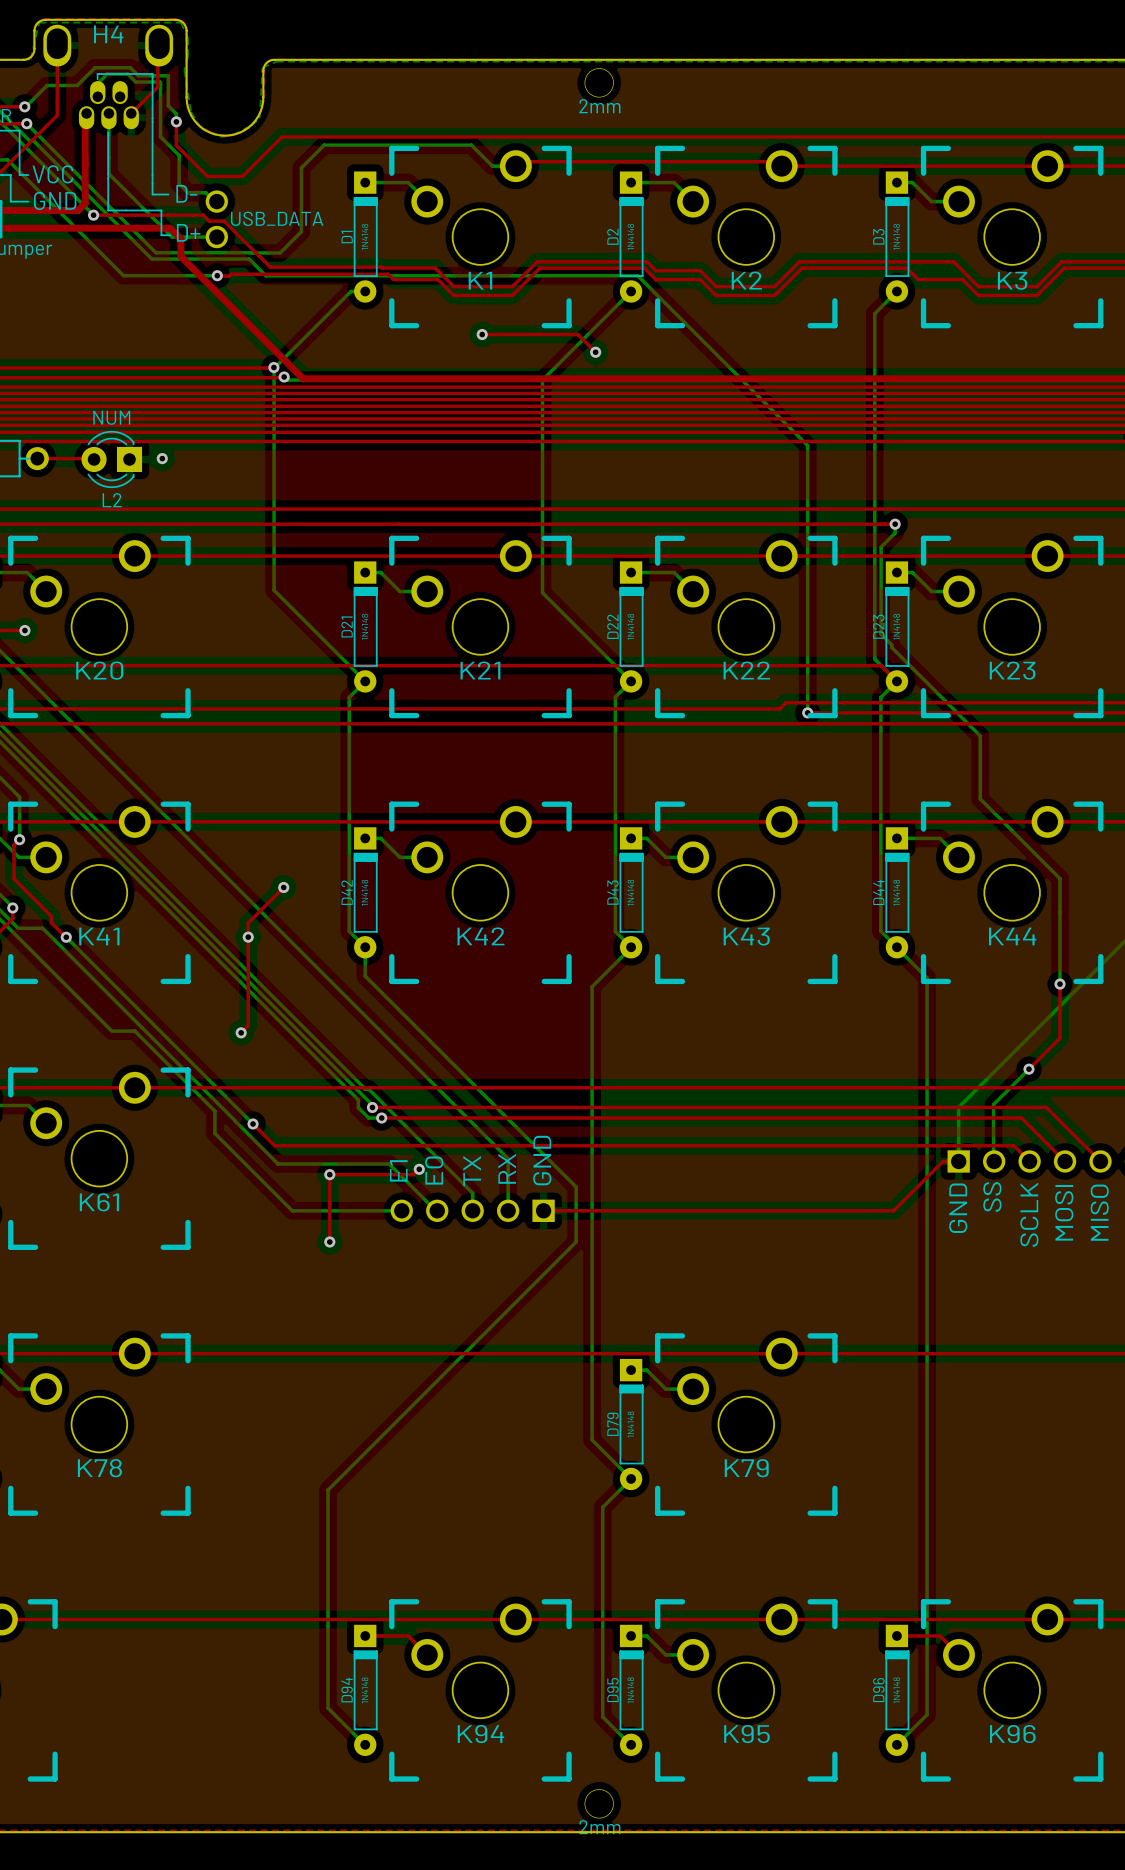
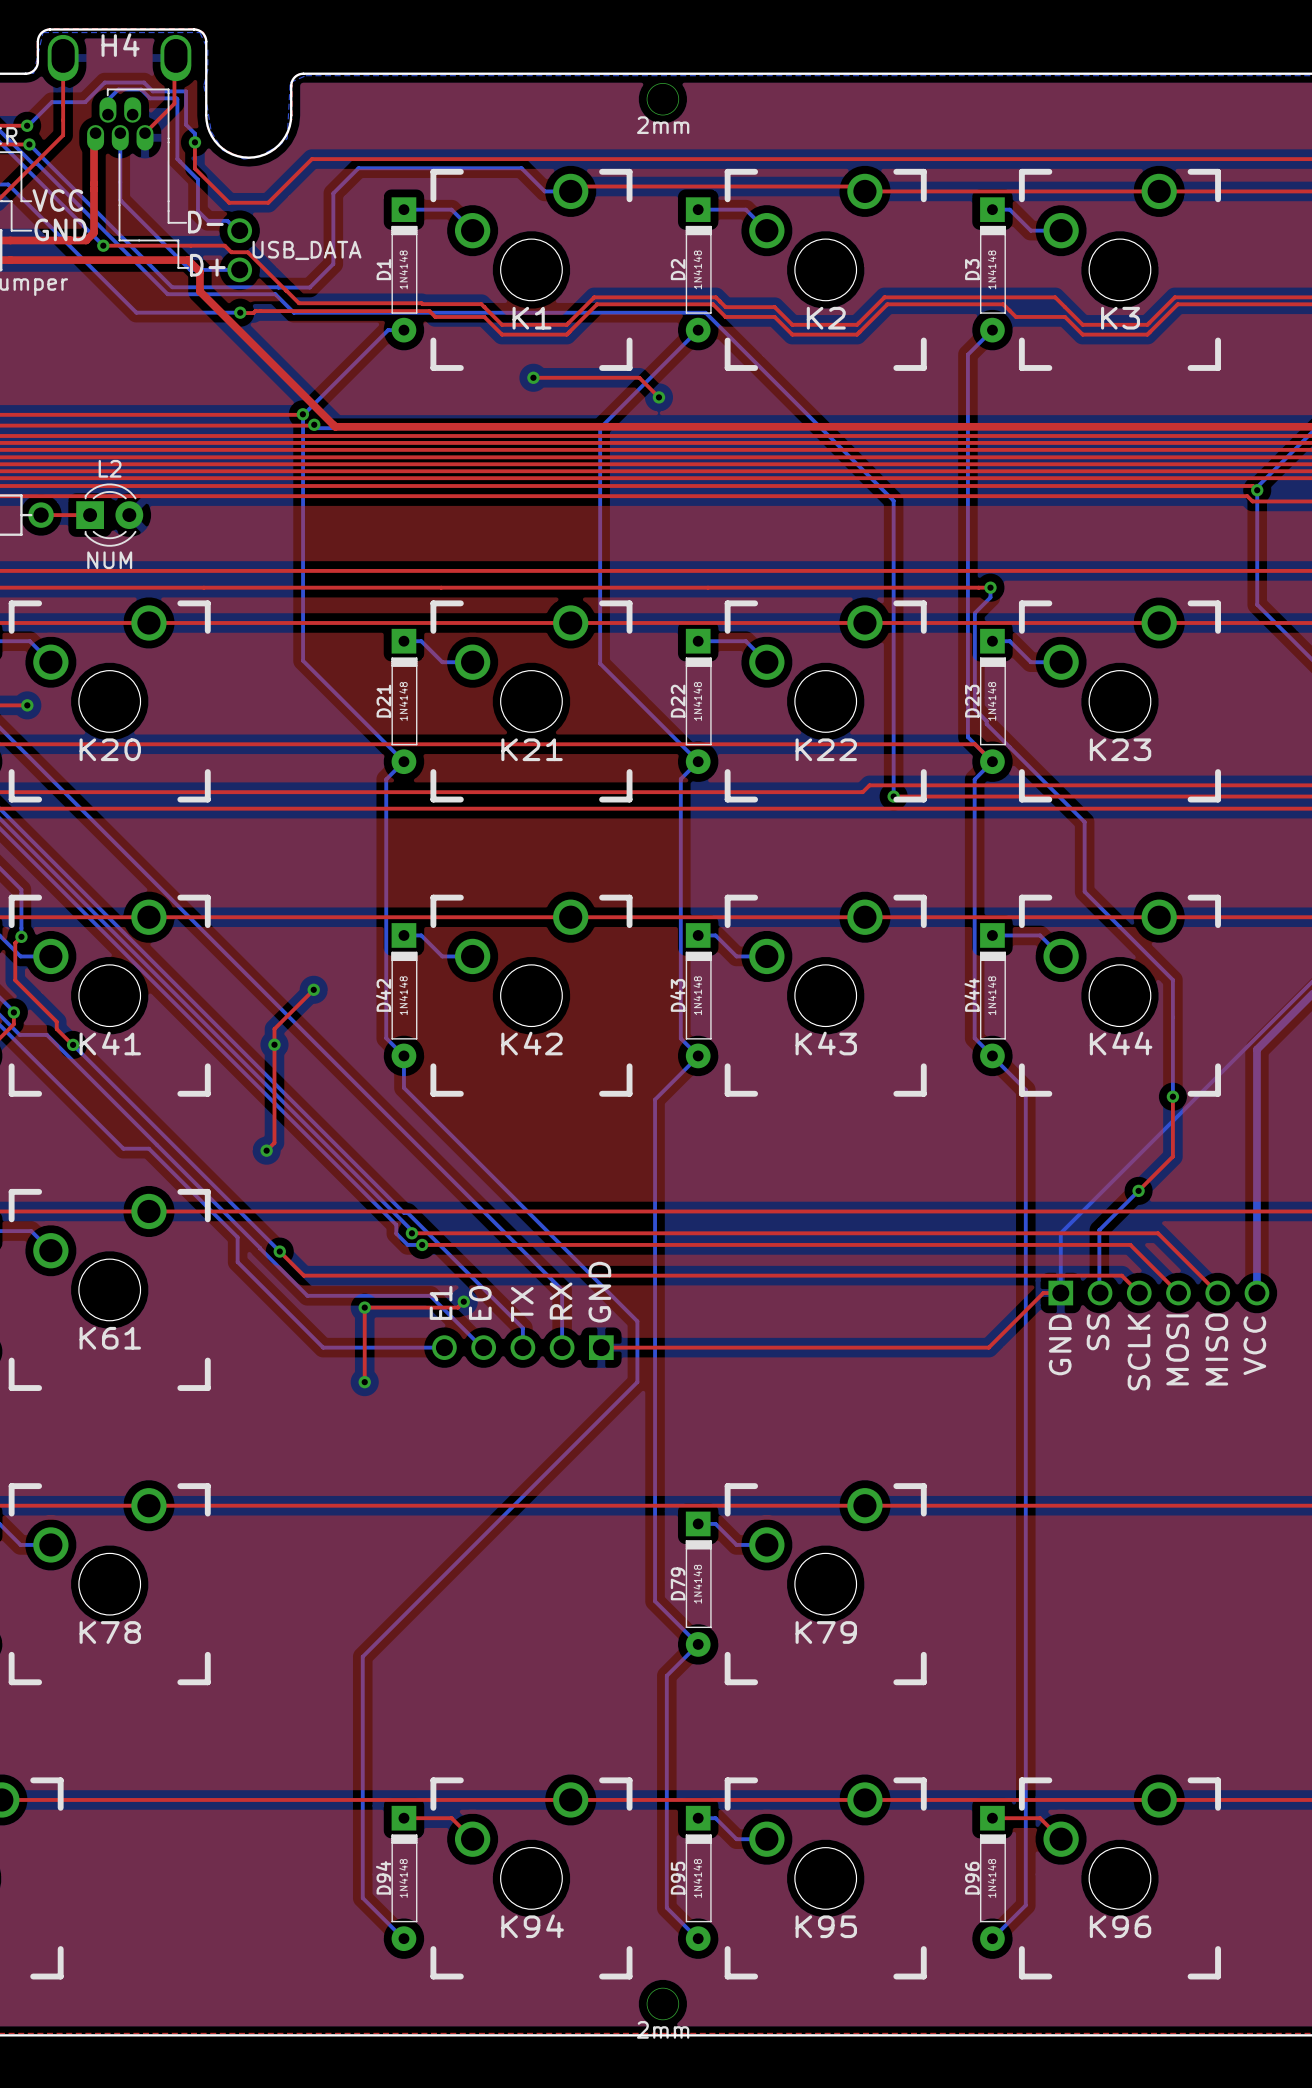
via: (162, 458) -> none
L2 rotation: 0° (111, 459) -> 180° (109, 515)

